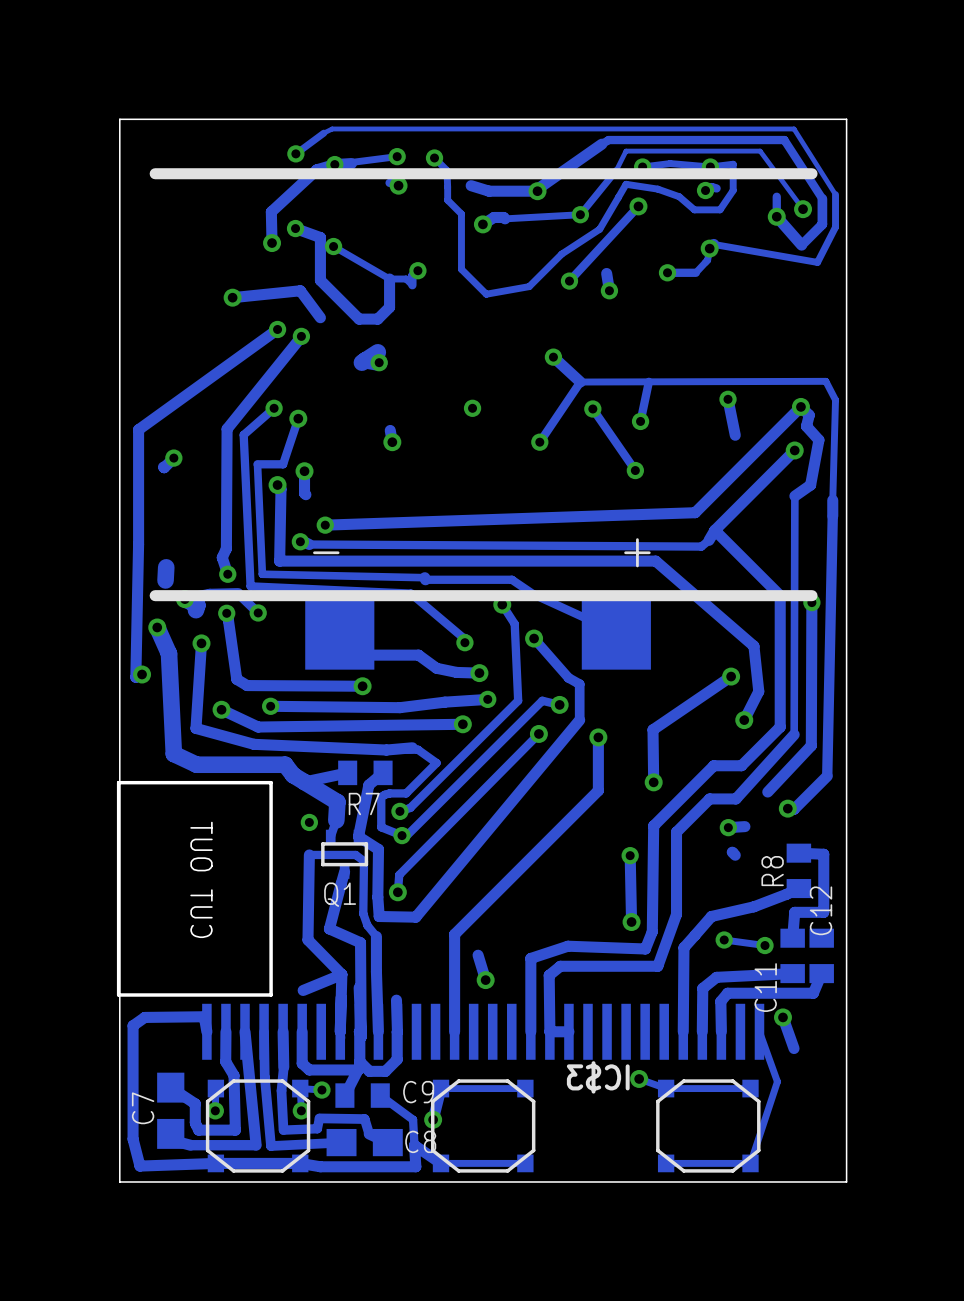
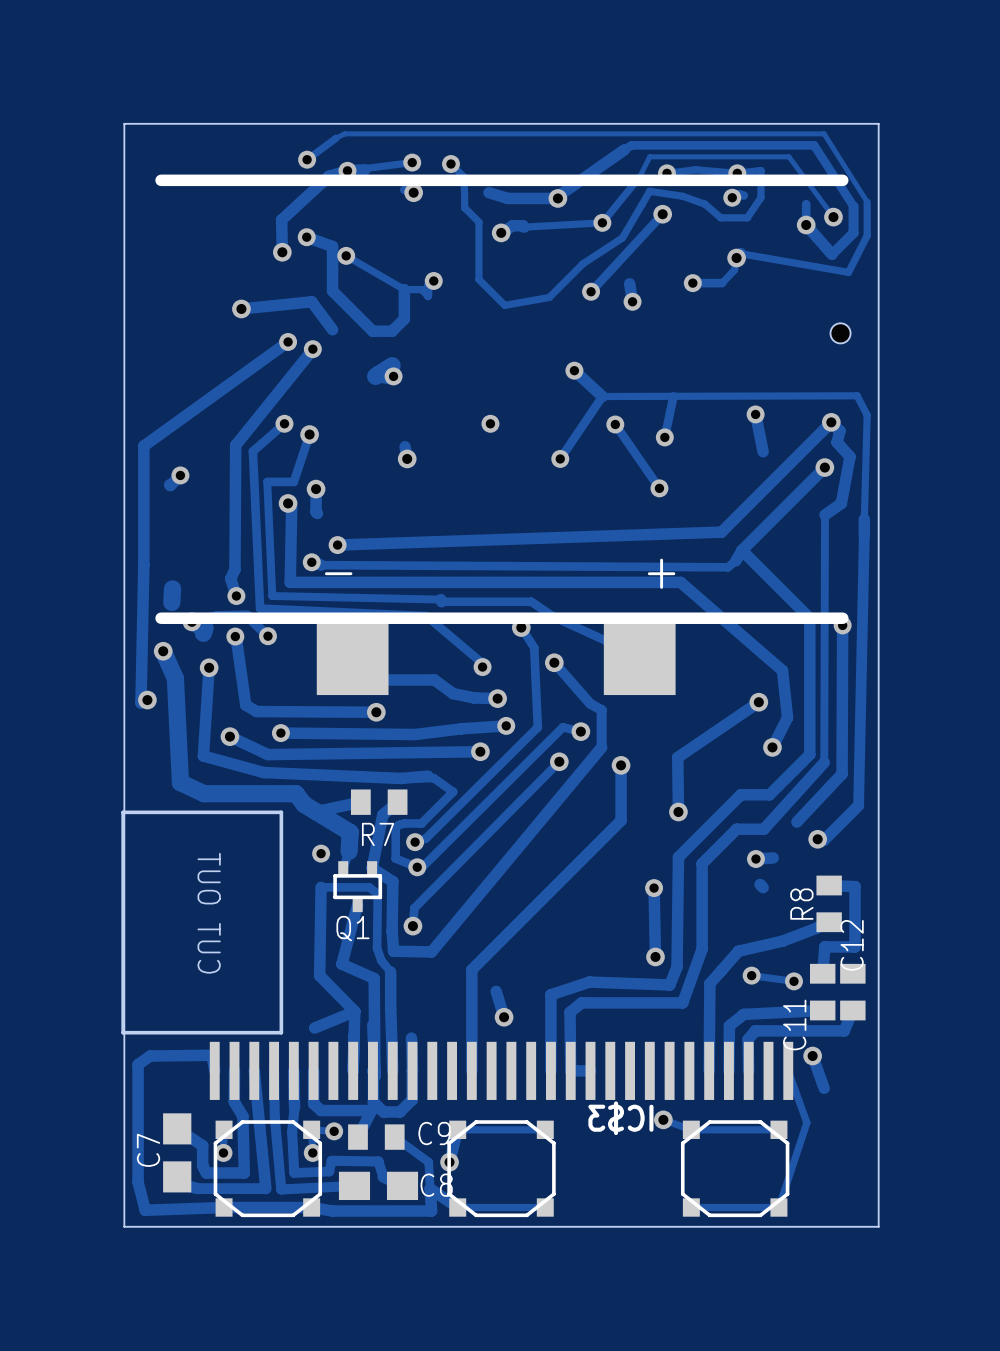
hole: none -> (840, 333)

